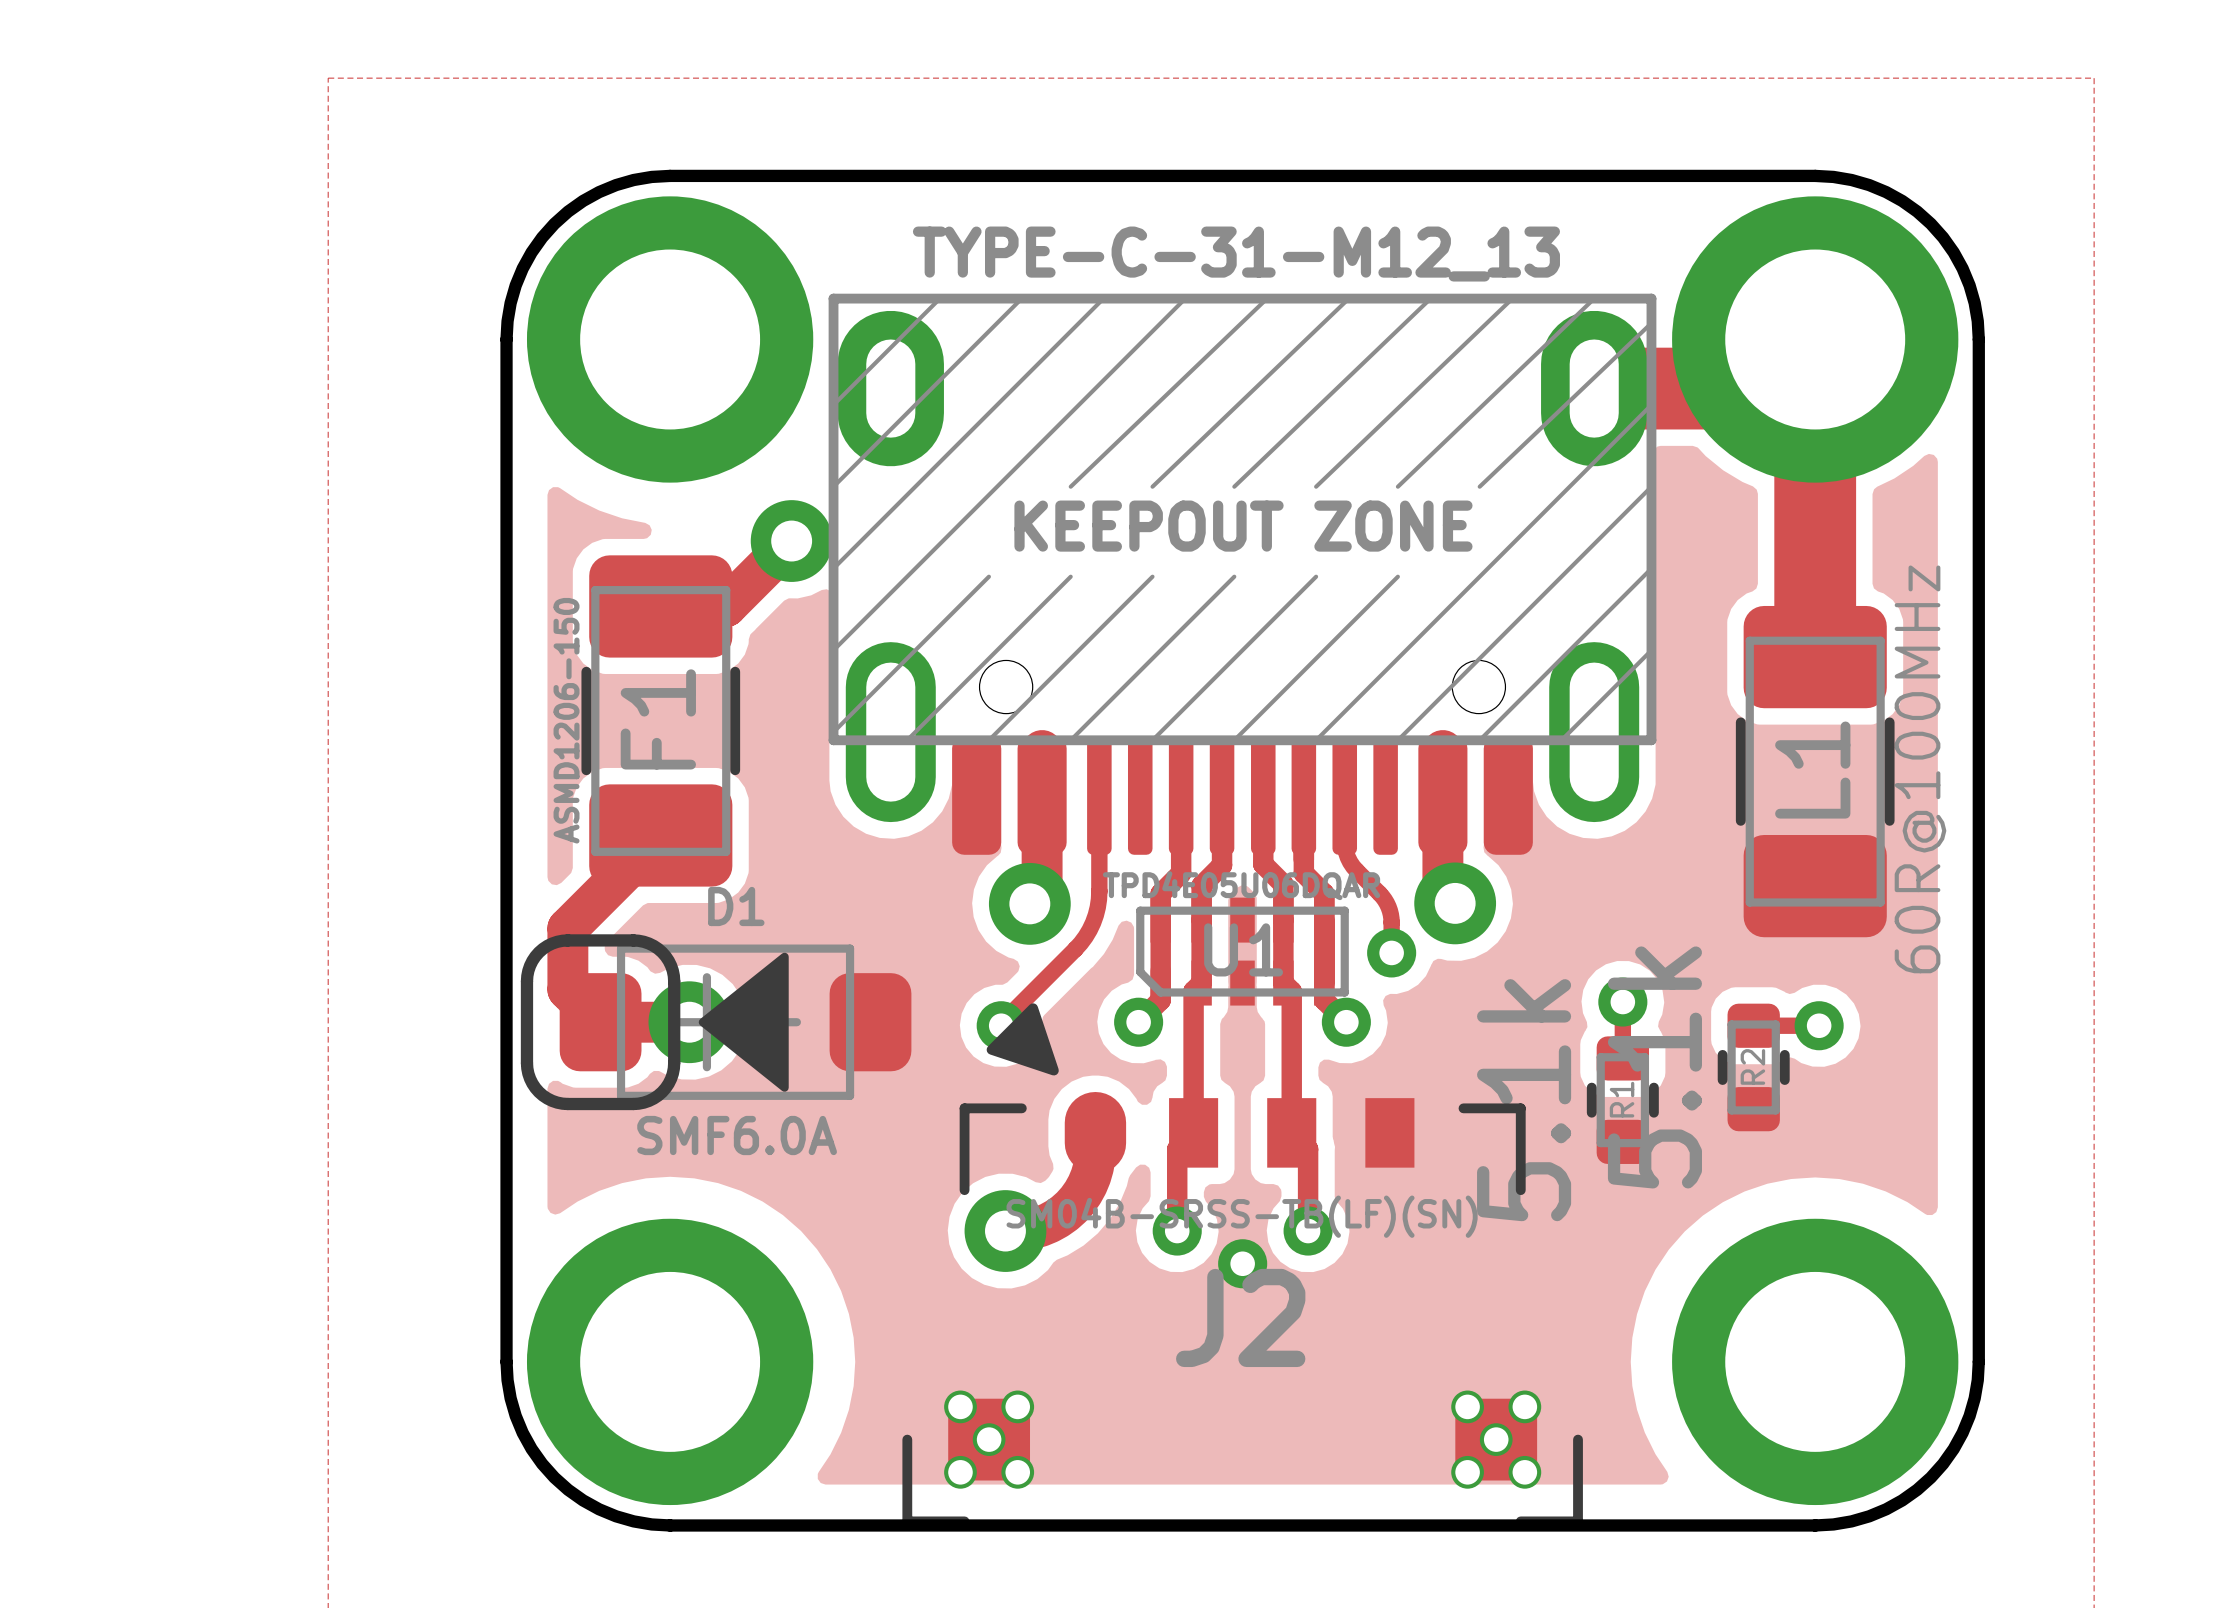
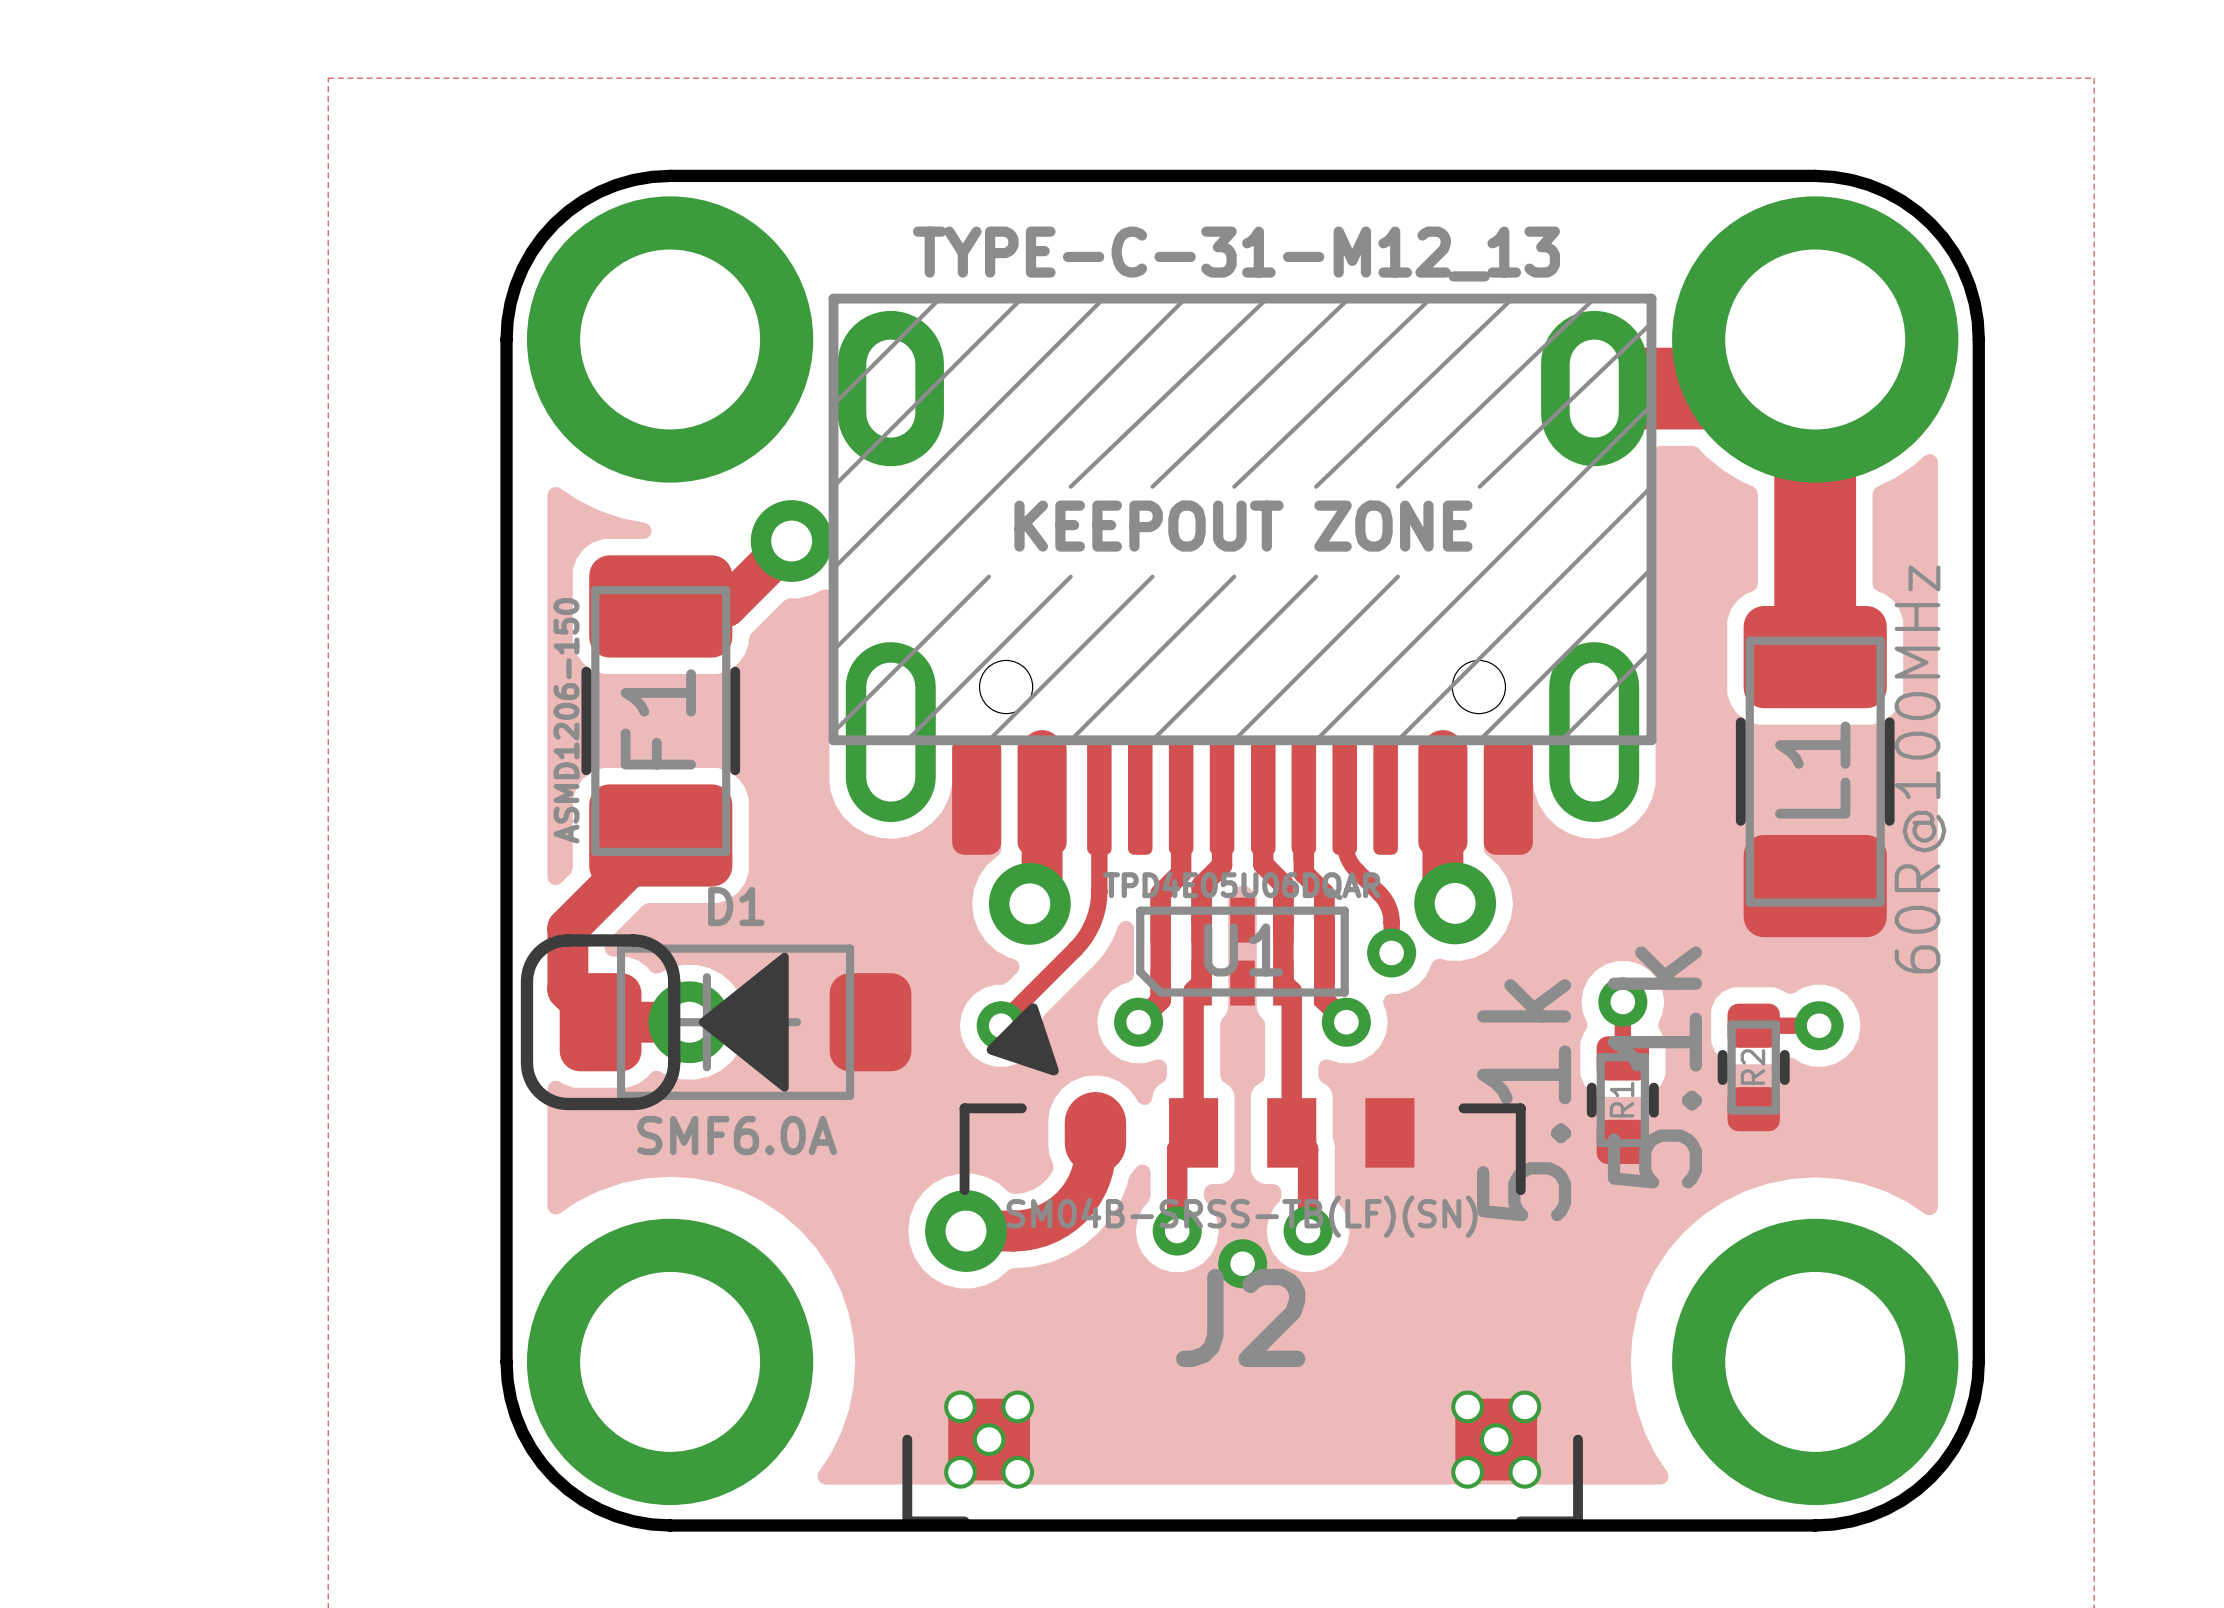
via position: (1005, 1231) -> (965, 1231)

